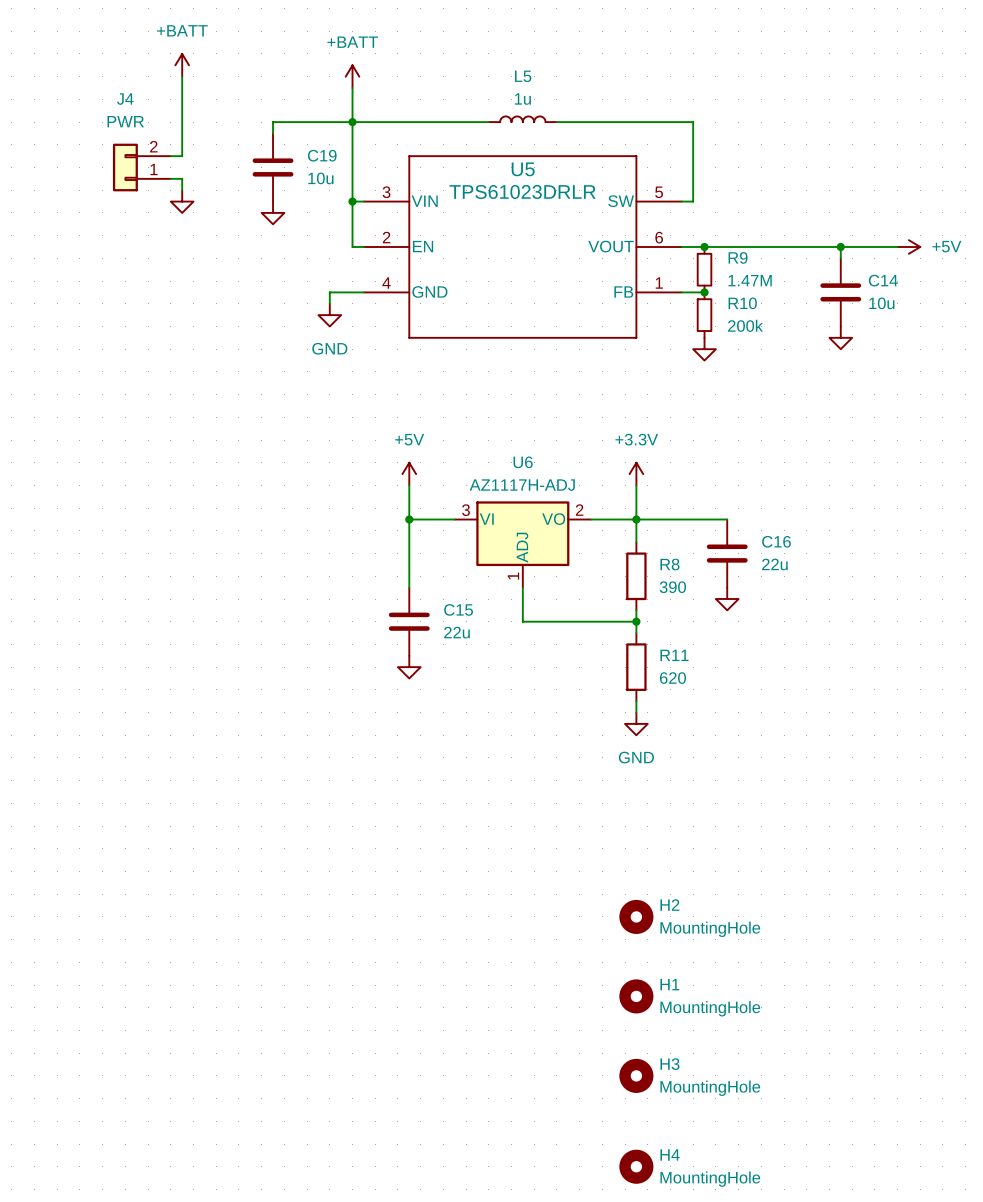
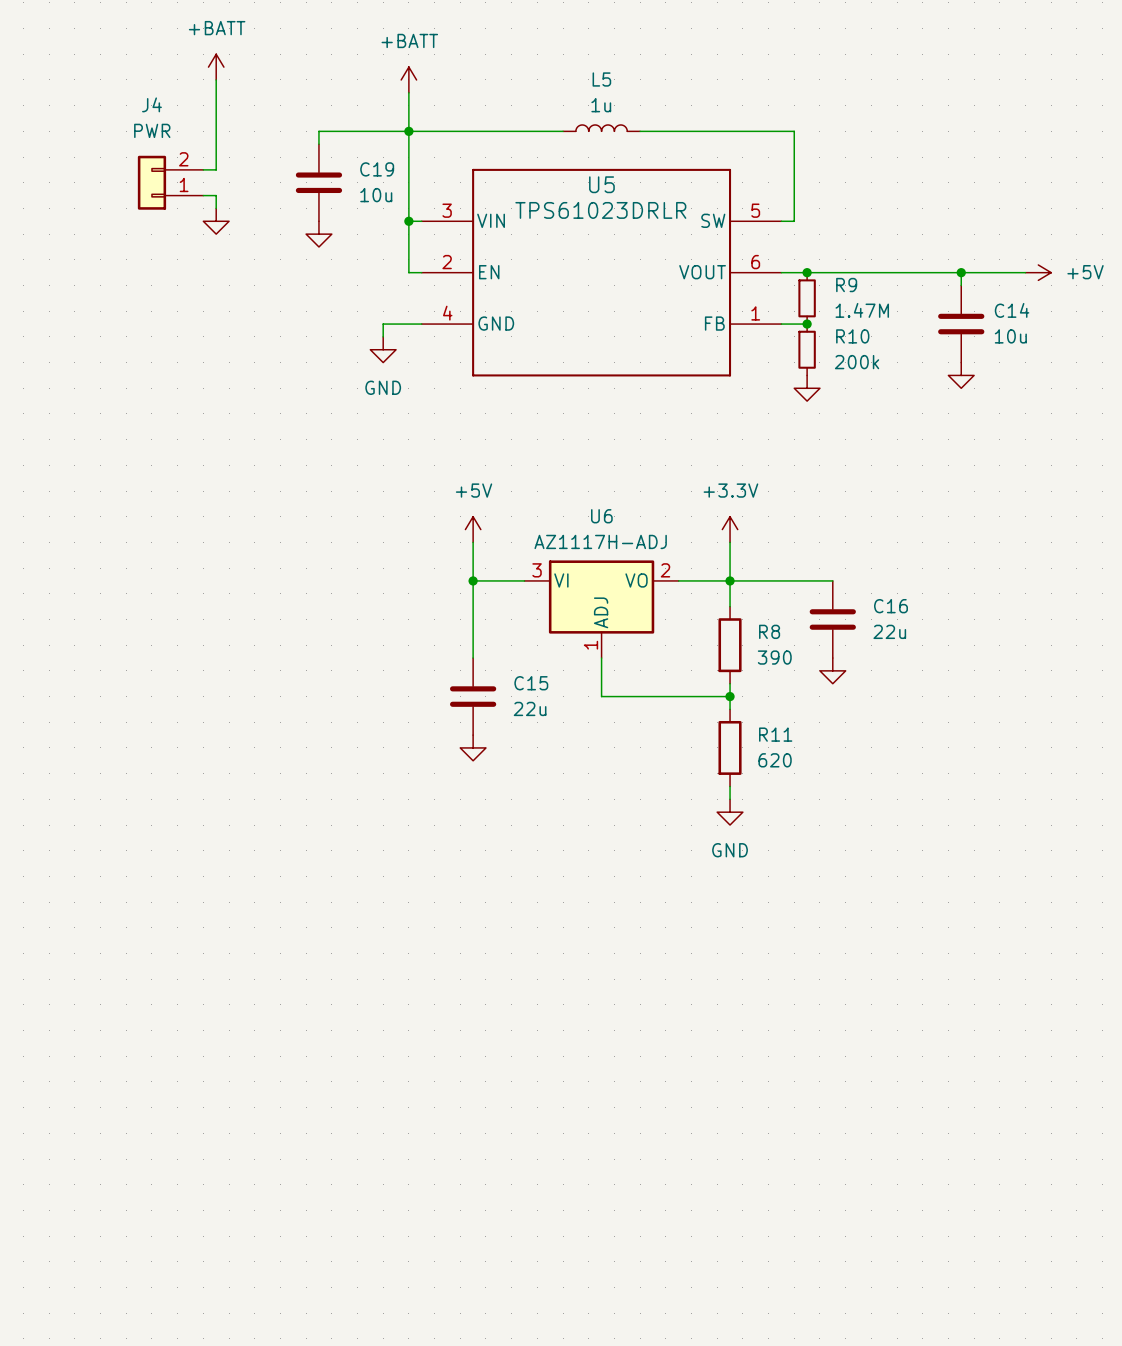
H2: MountingHole (636, 916) -> none
H1: MountingHole (636, 996) -> none
H3: MountingHole (636, 1075) -> none
H4: MountingHole (636, 1166) -> none

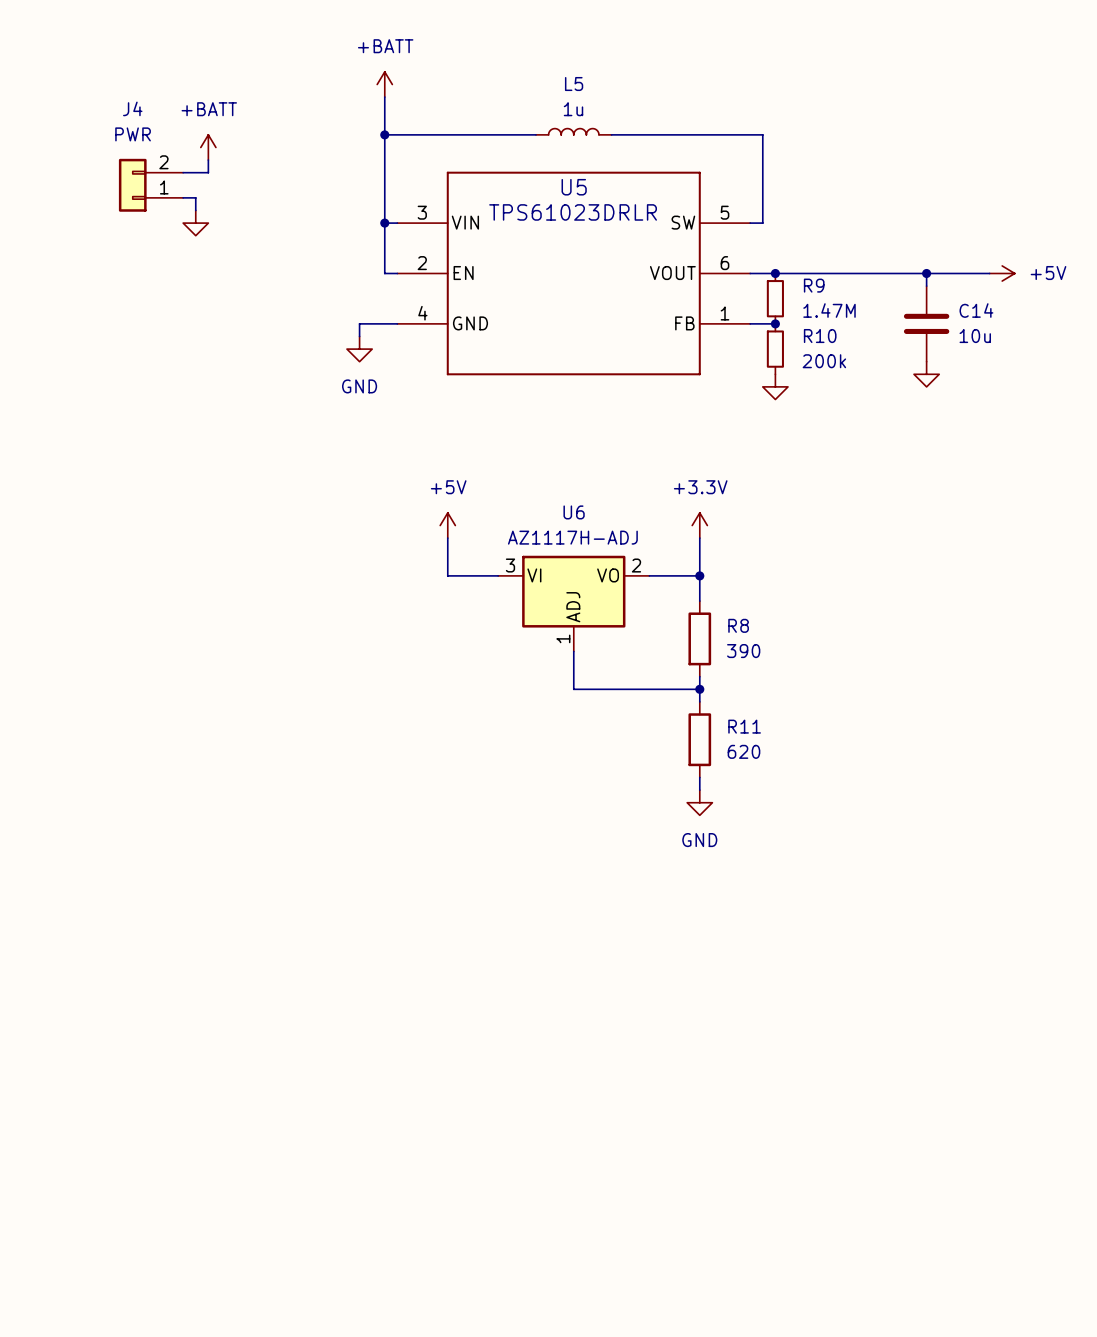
power symbol position: +BATT (216, 67) -> +BATT (208, 147)
wire: (216, 79) (216, 169) -> (208, 160) (208, 172) (195, 172)
wire: (408, 131) (318, 131) (318, 144) -> none
C19: 10u (318, 182) -> none
power symbol: (318, 234) -> none
wire: (473, 580) (473, 658) -> none
junction: (473, 580) -> none
wire: (730, 580) (832, 580) -> none
C16: 22u (832, 619) -> none
power symbol: (832, 670) -> none
C15: 22u (473, 696) -> none
power symbol: (473, 747) -> none

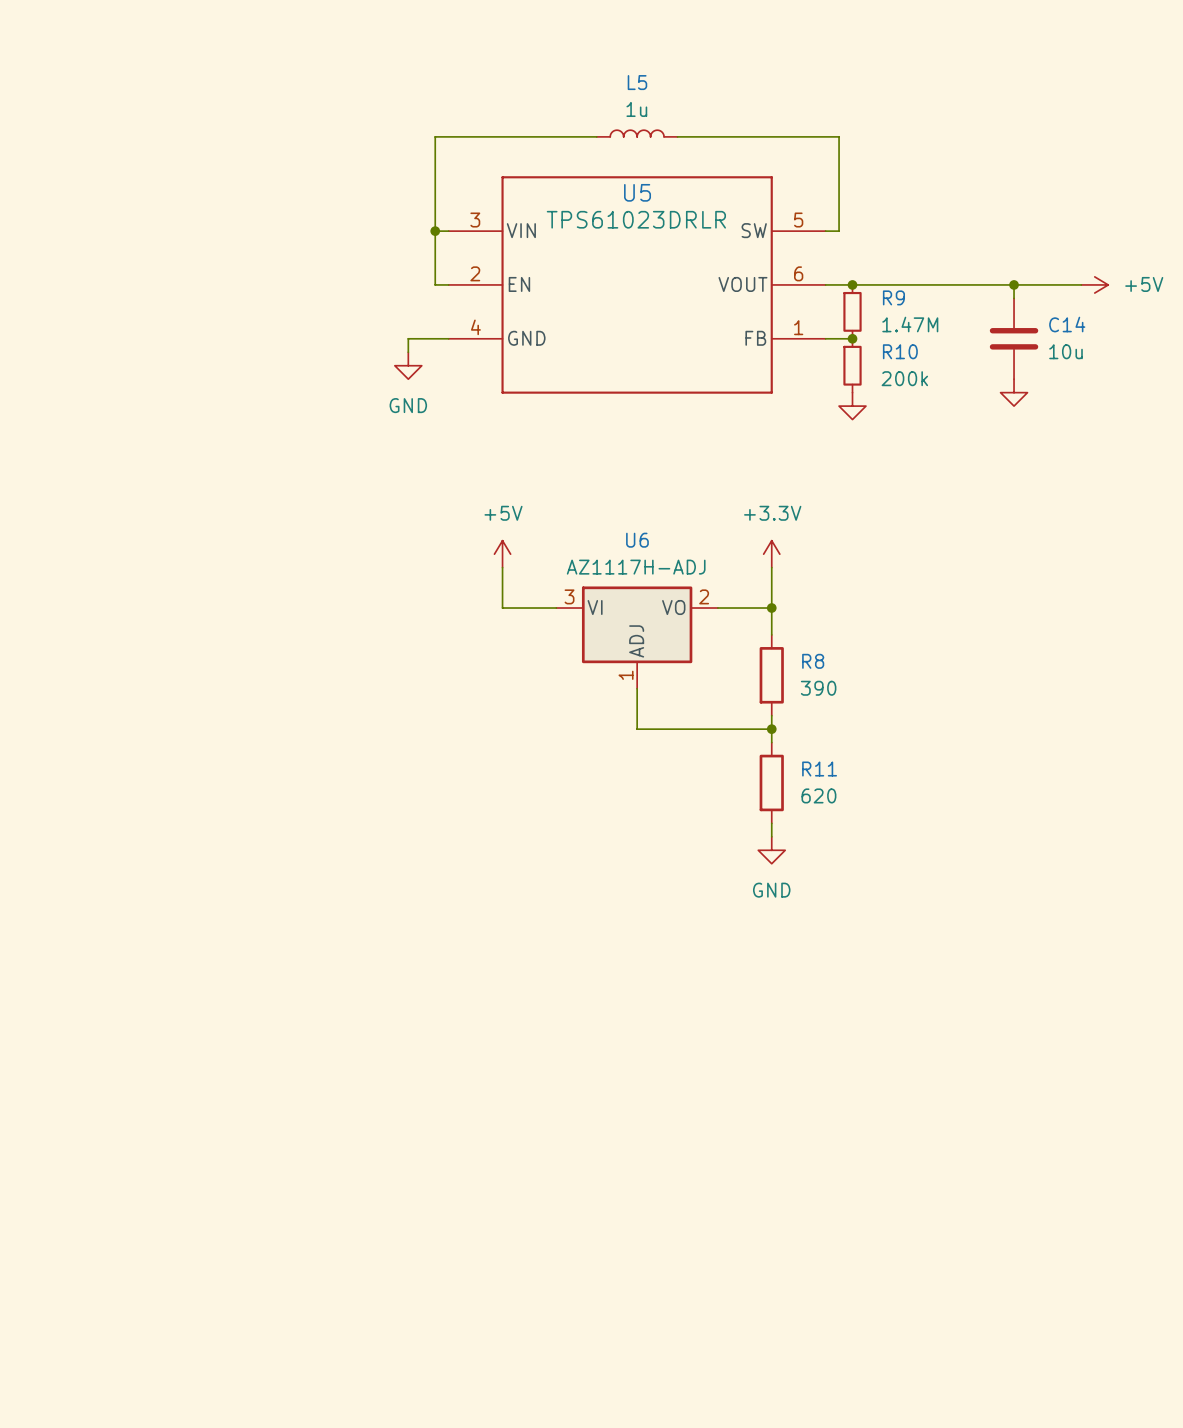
power symbol: +BATT (384, 84) -> none
wire: (384, 97) (384, 134) -> none
junction: (384, 134) -> none
power symbol: +BATT (208, 147) -> none
wire: (208, 160) (208, 172) (183, 172) -> none
J4: PWR (151, 185) -> none
wire: (183, 197) (195, 197) (195, 210) -> none
power symbol: (195, 223) -> none

